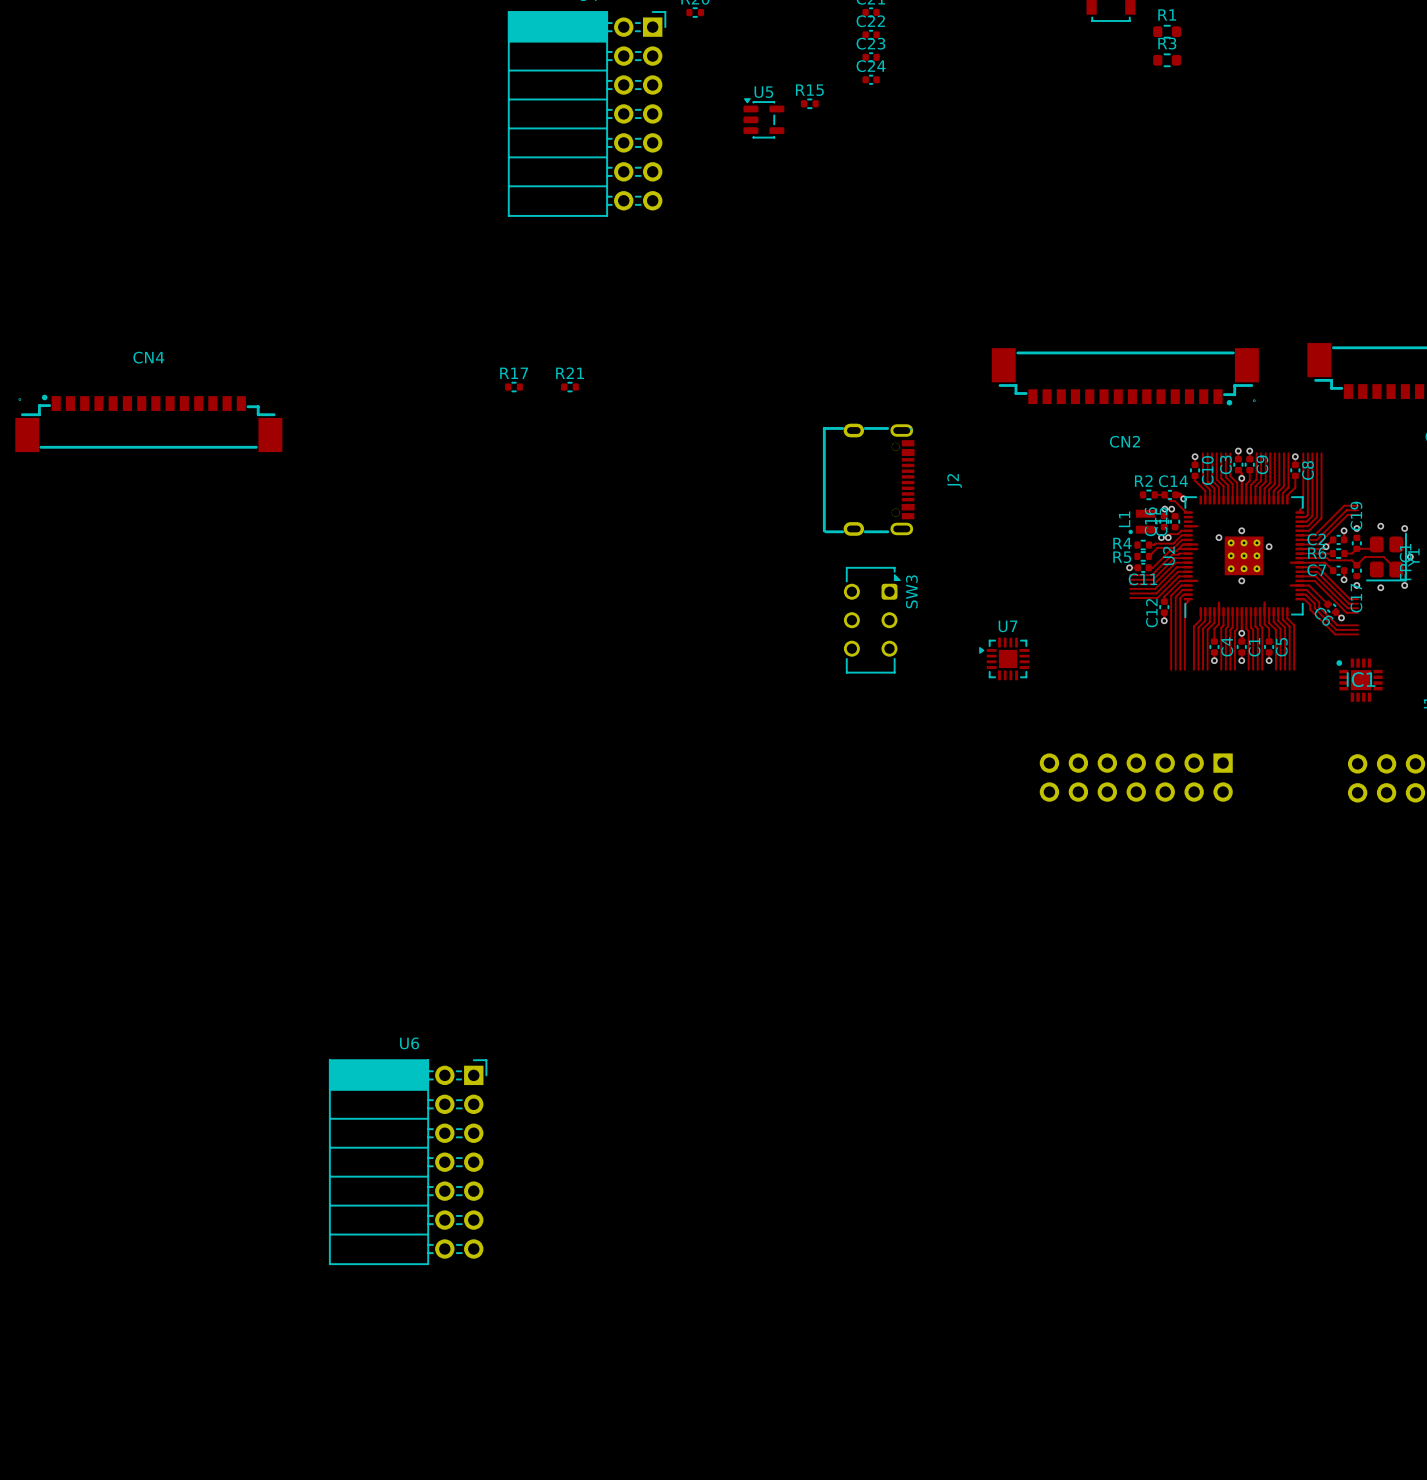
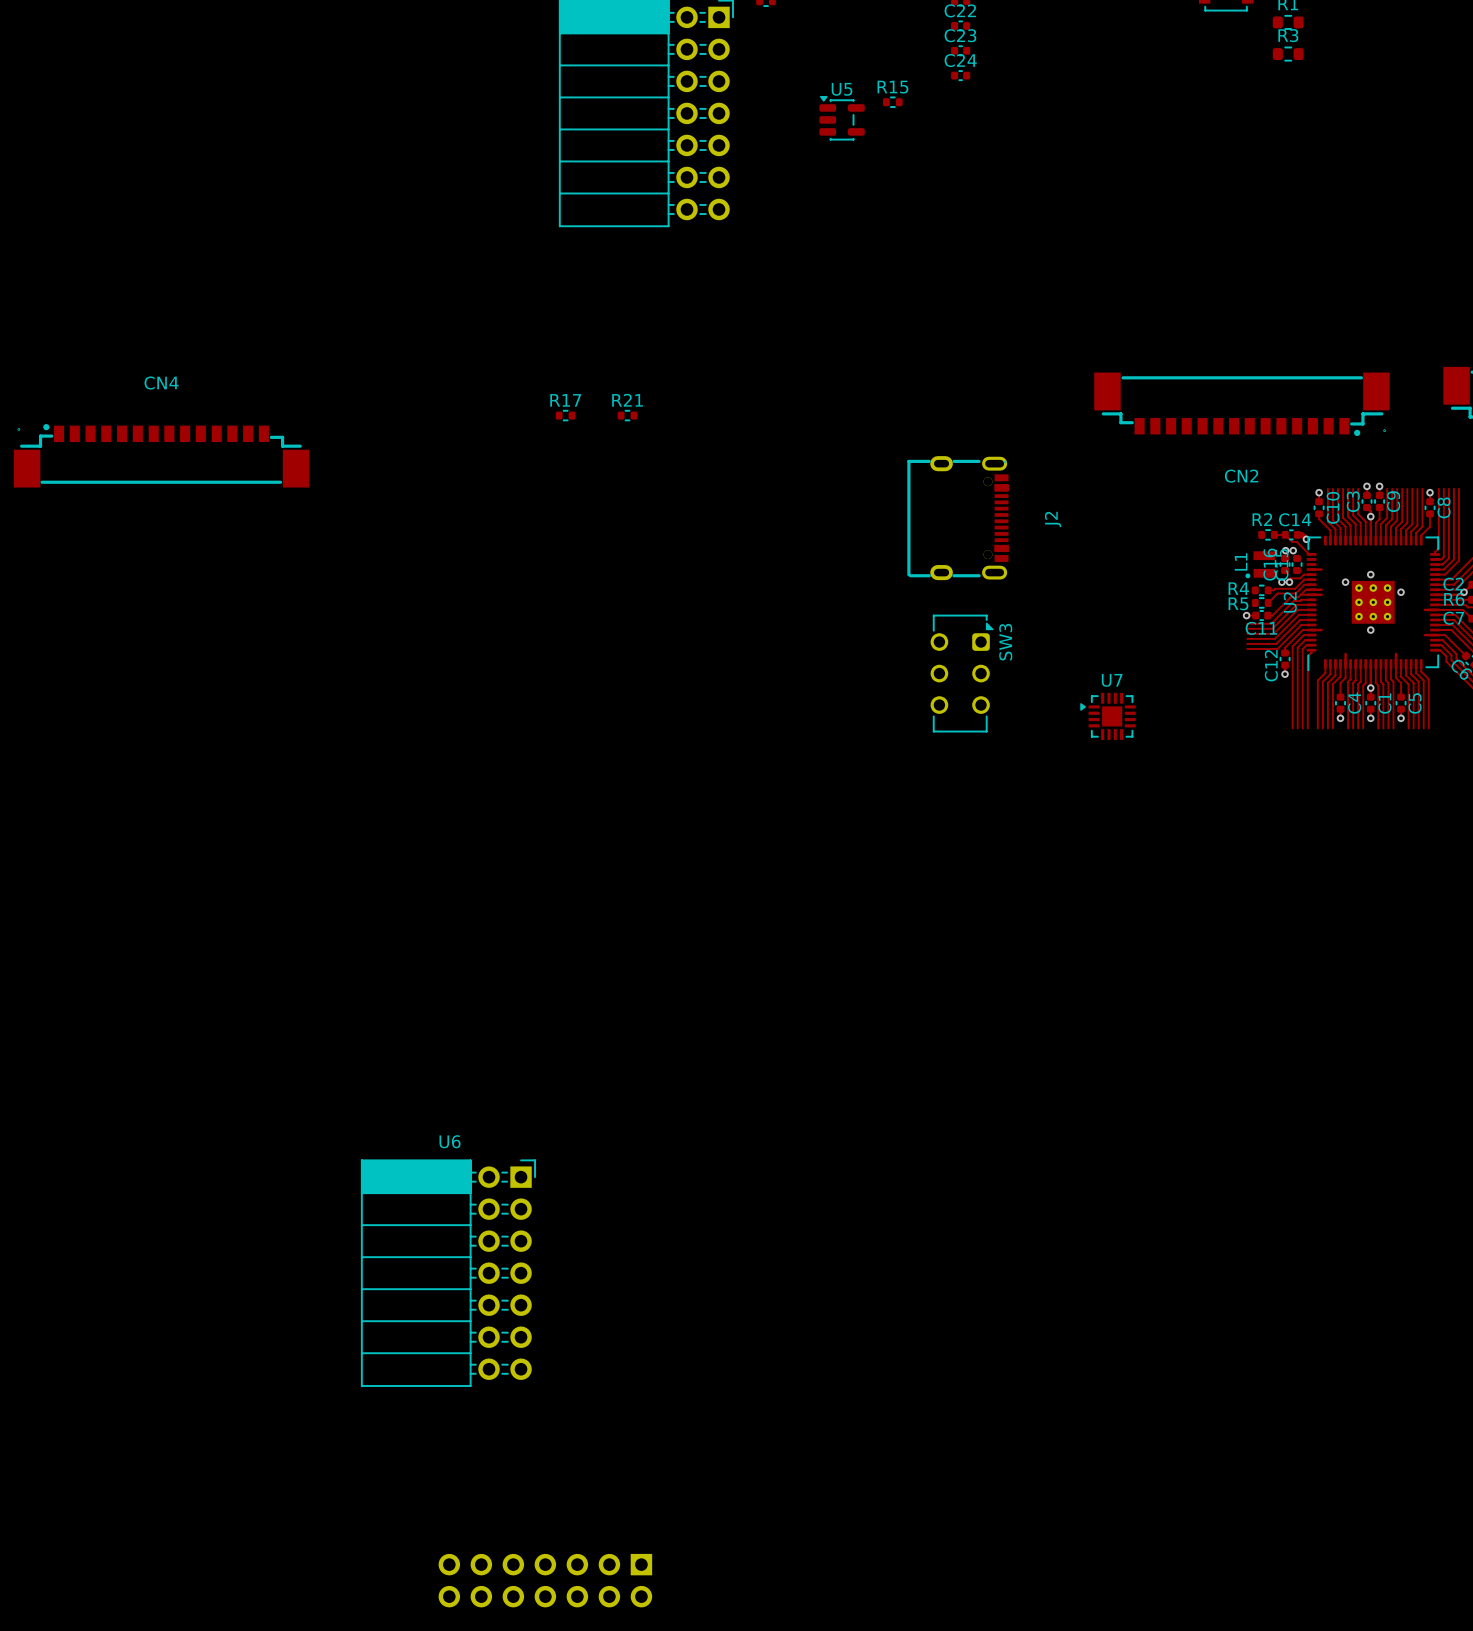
part: (1136, 777) -> none
part: none -> (545, 1580)

